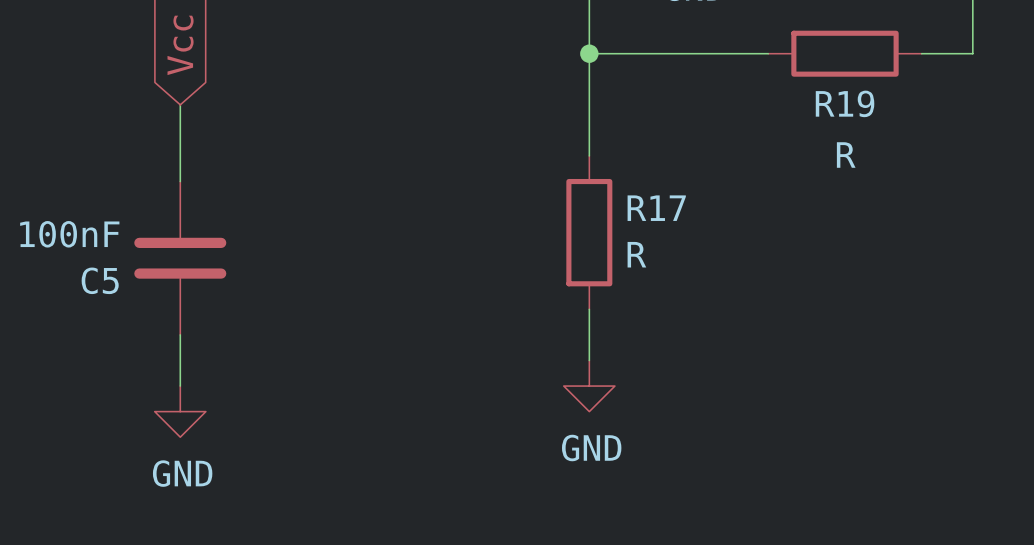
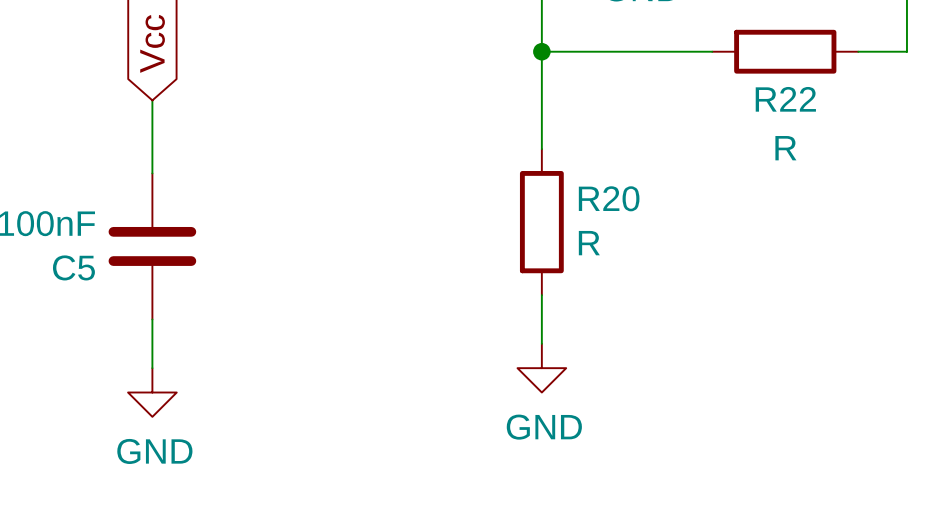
R19 name: R19 (845, 103) -> R22 (785, 99)
R17 name: R17 (656, 208) -> R20 (609, 198)

